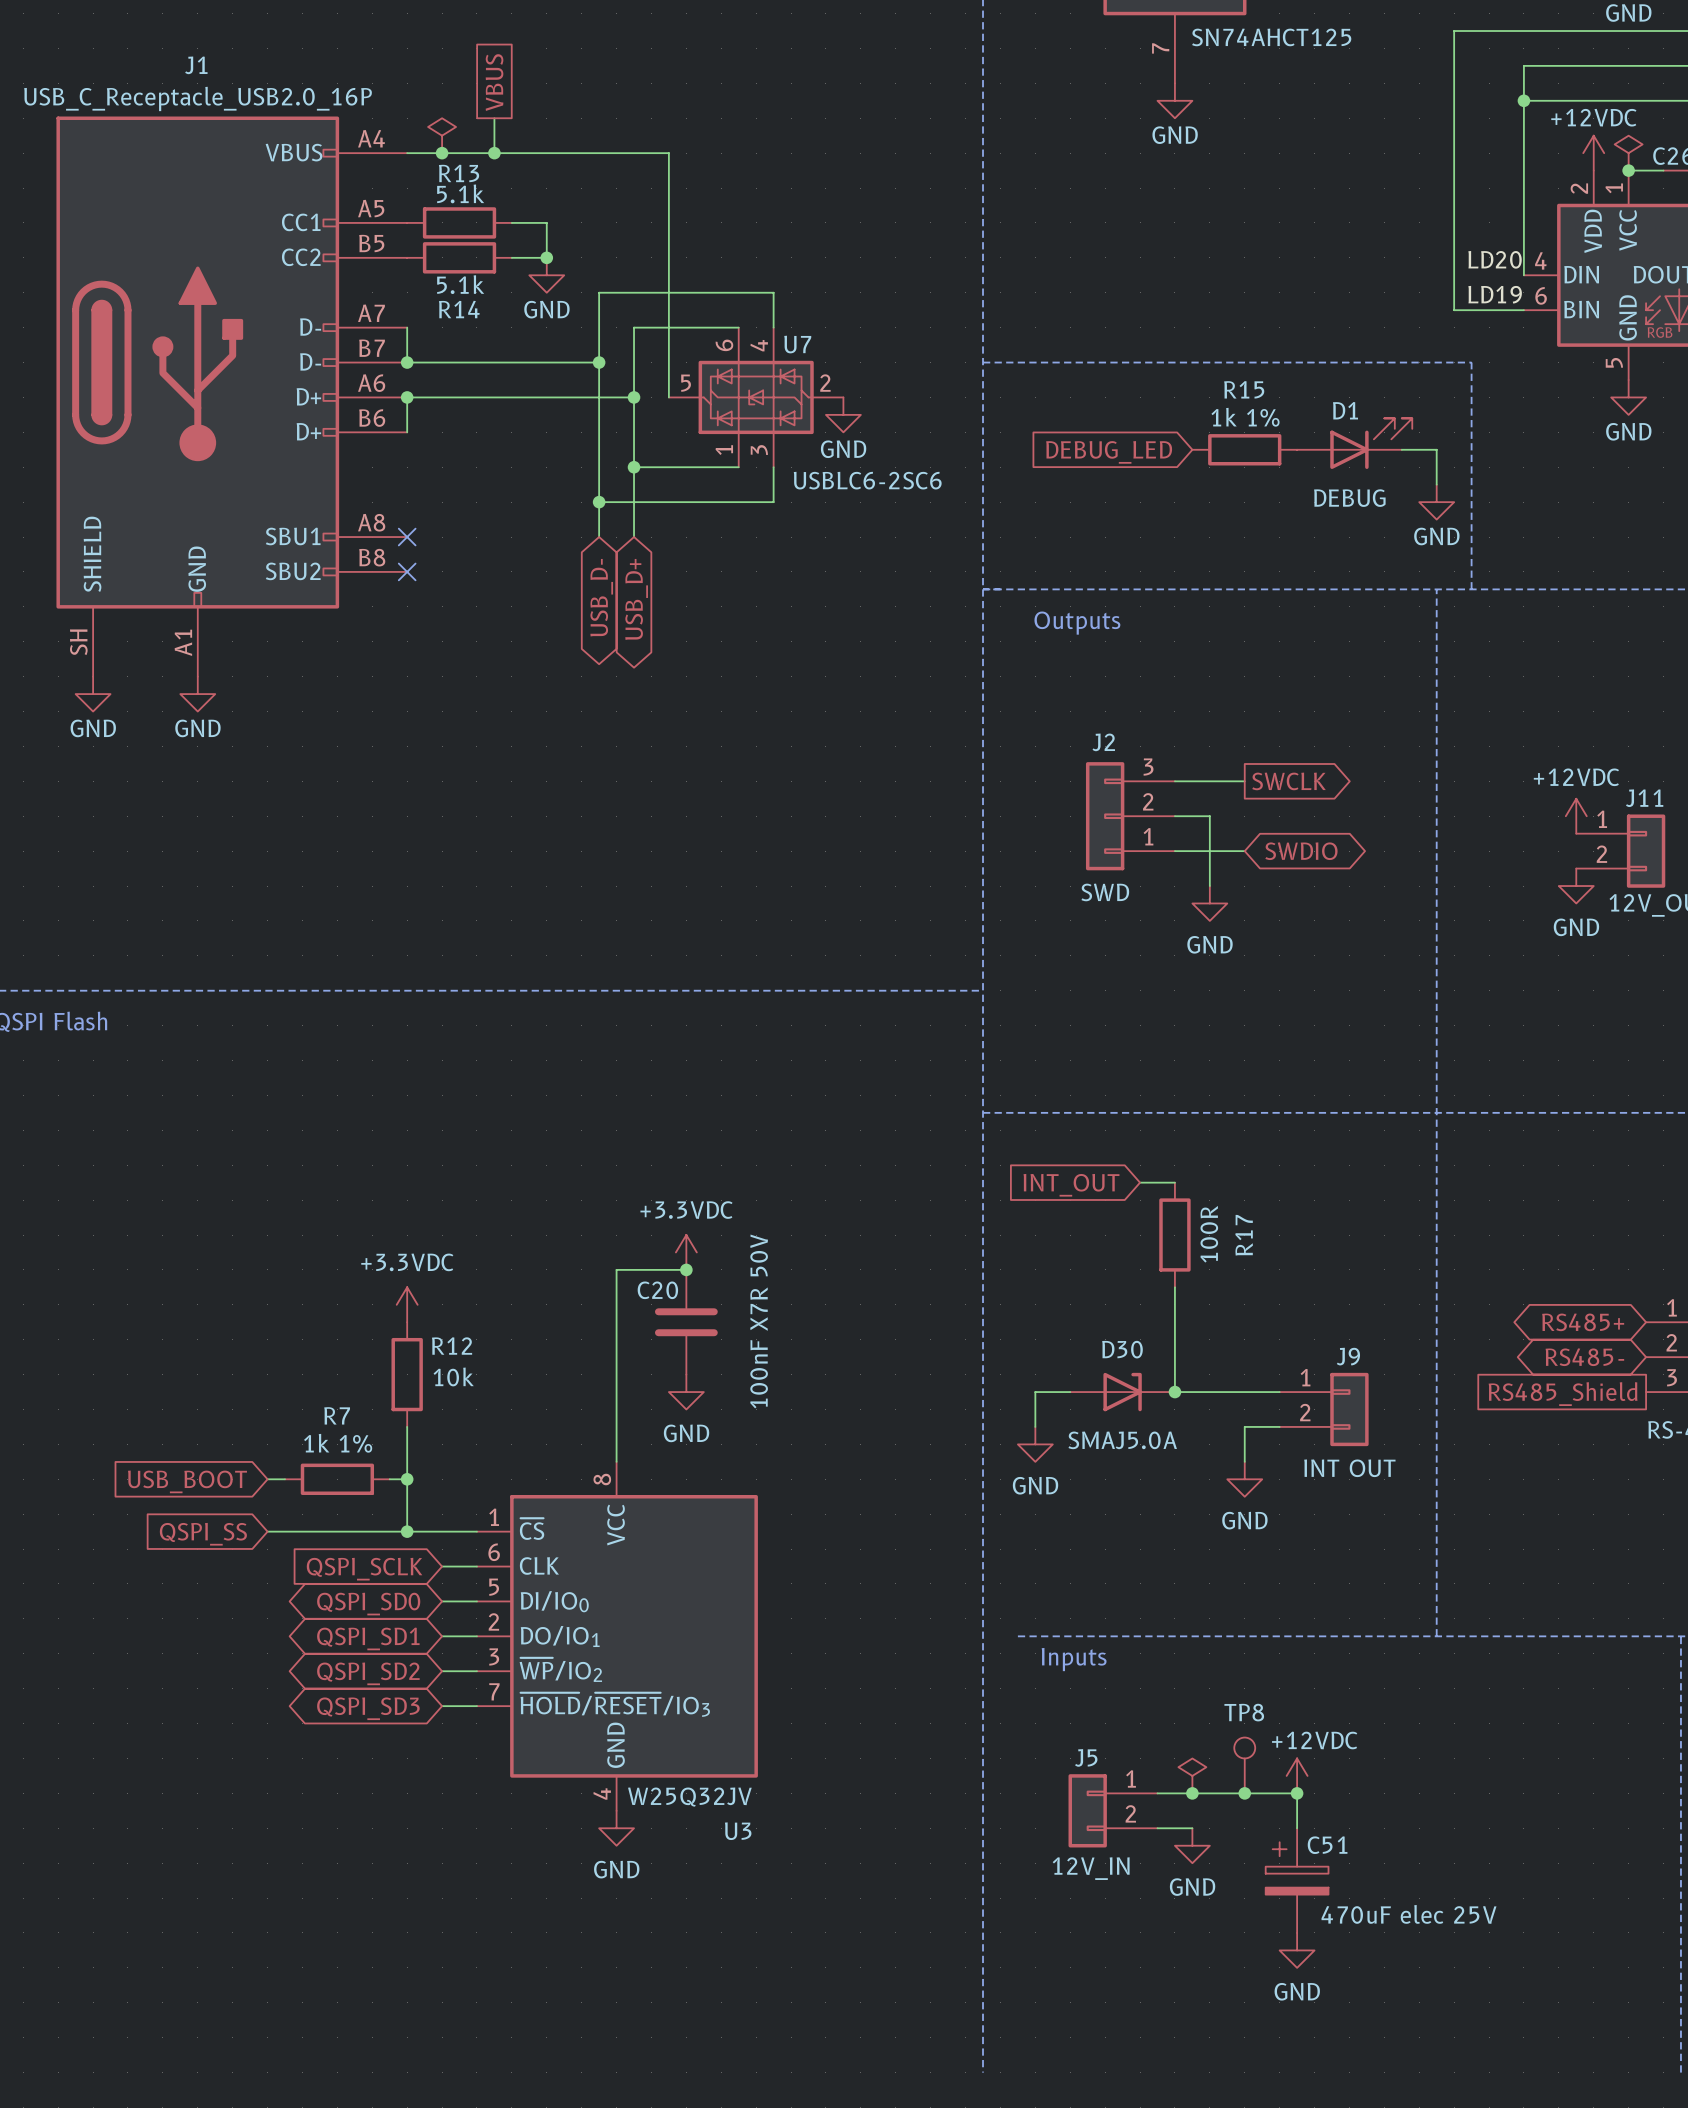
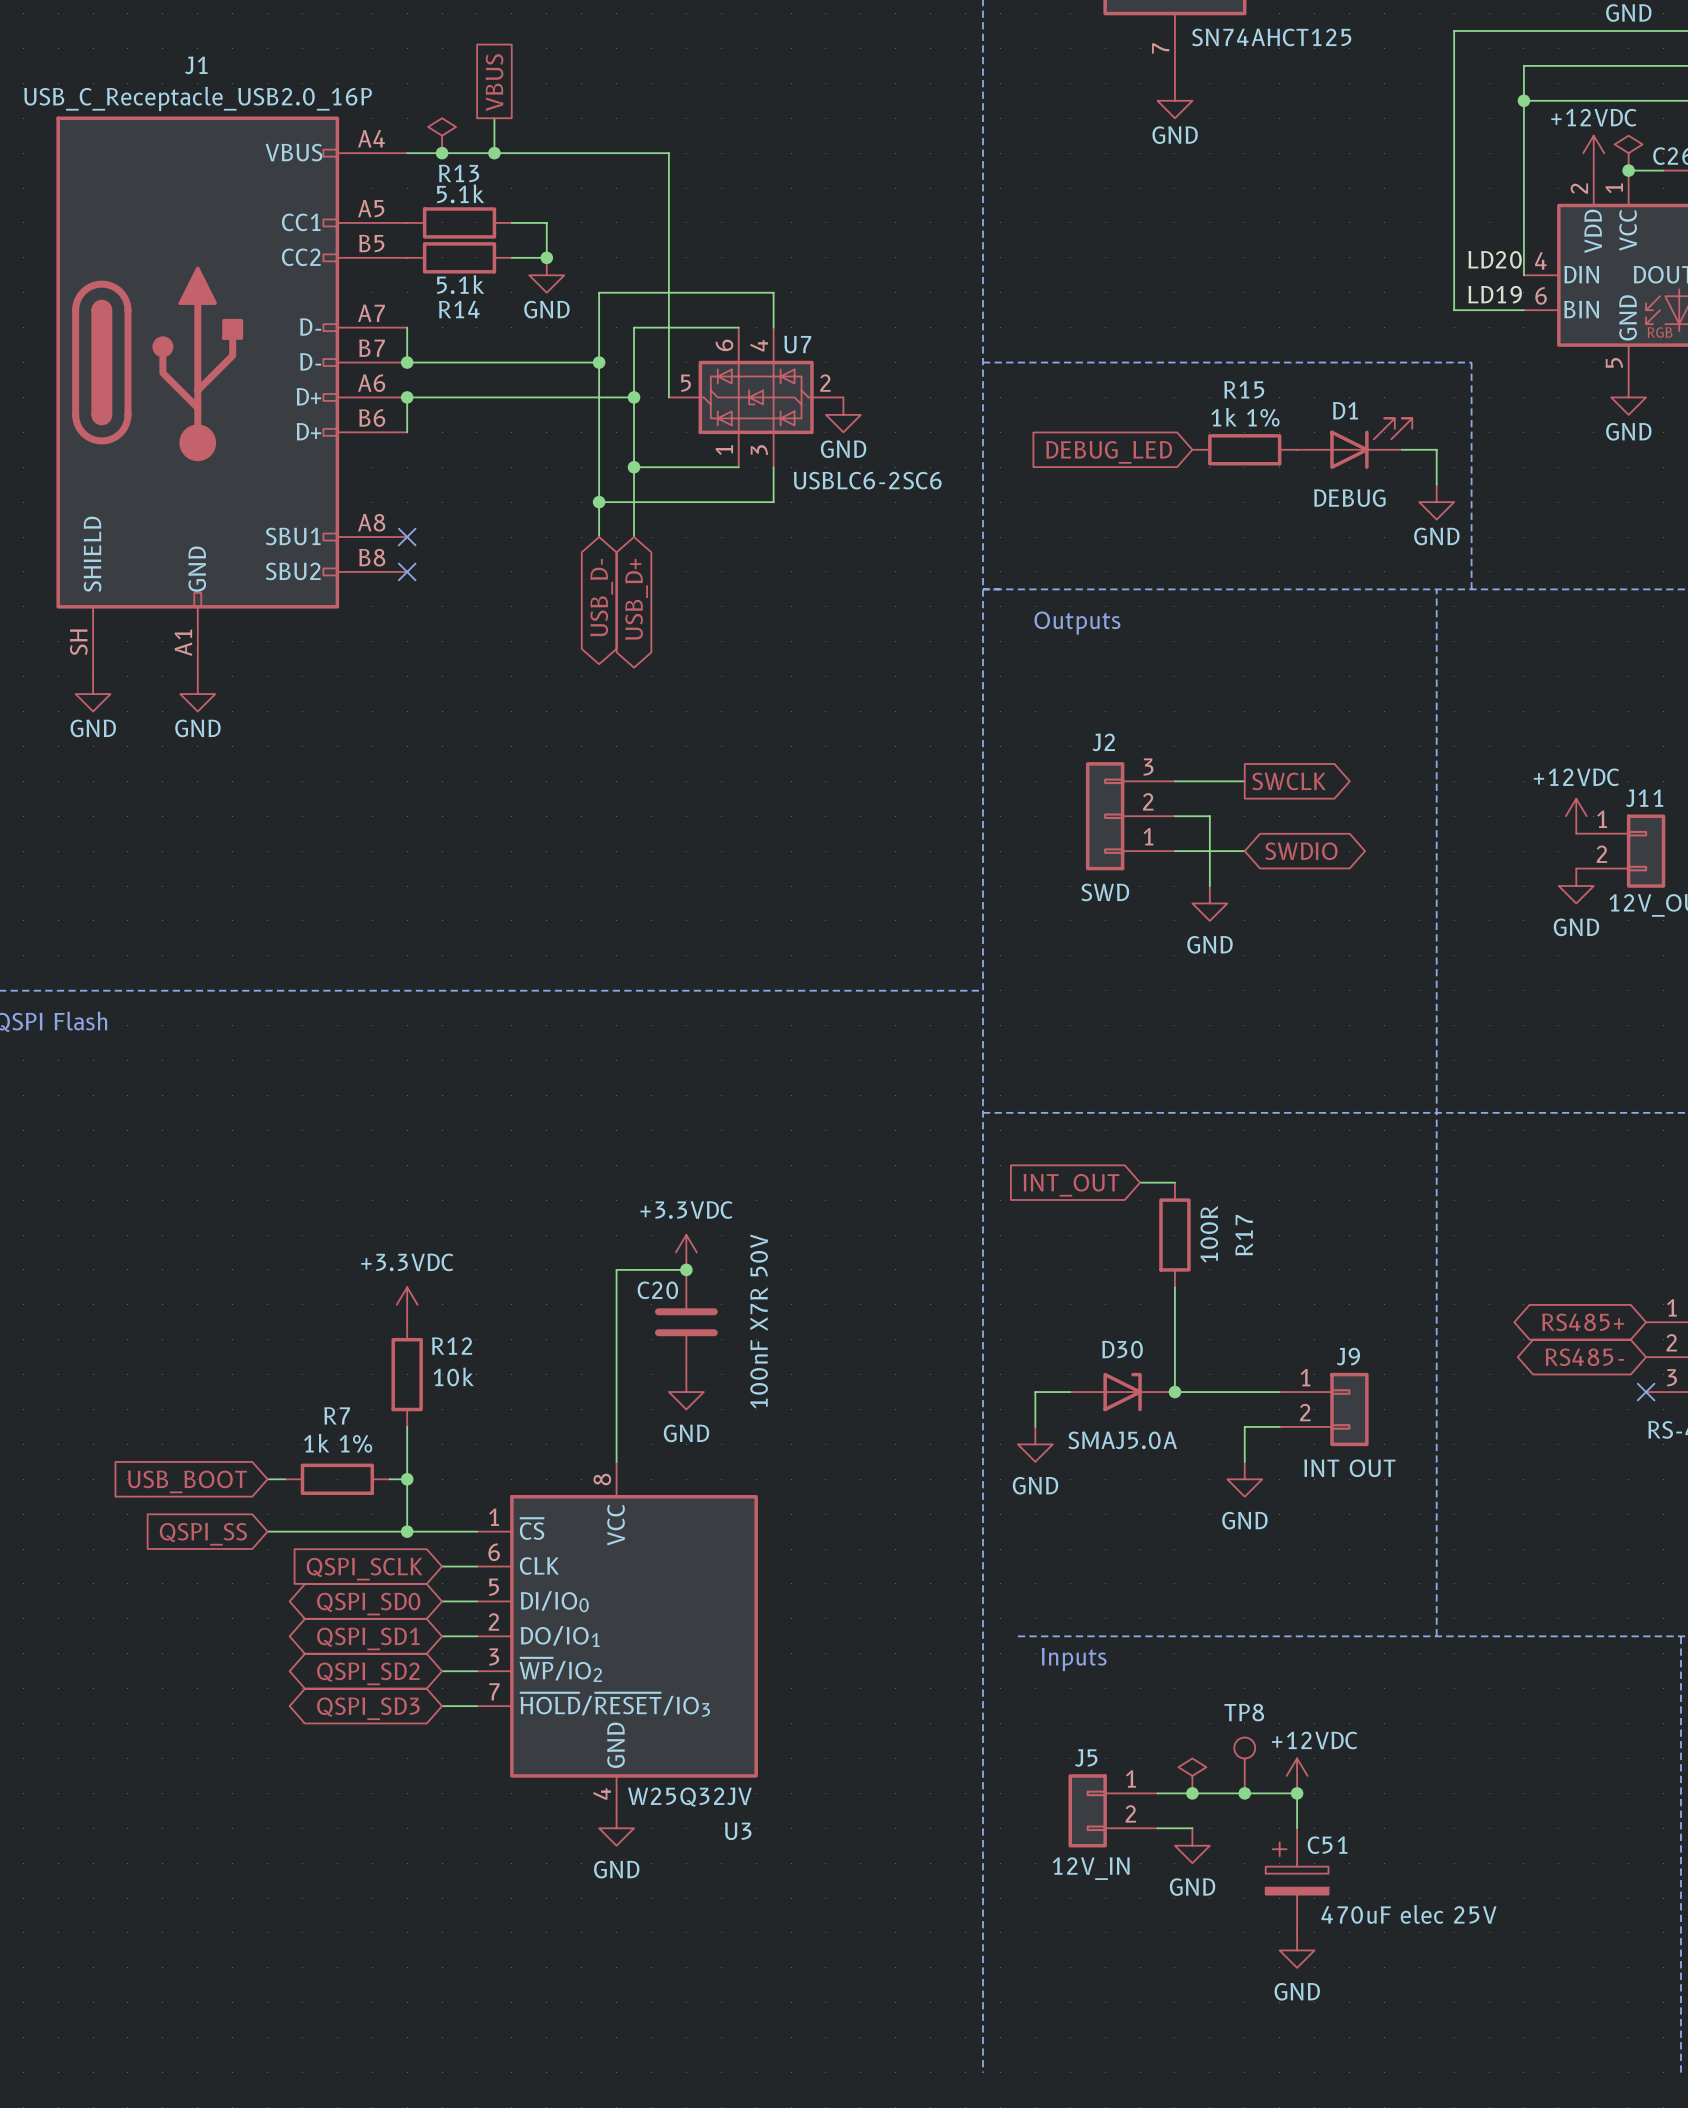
no-connect mark: none -> (1646, 1392)
global label: RS485_Shield (1563, 1394) -> none

